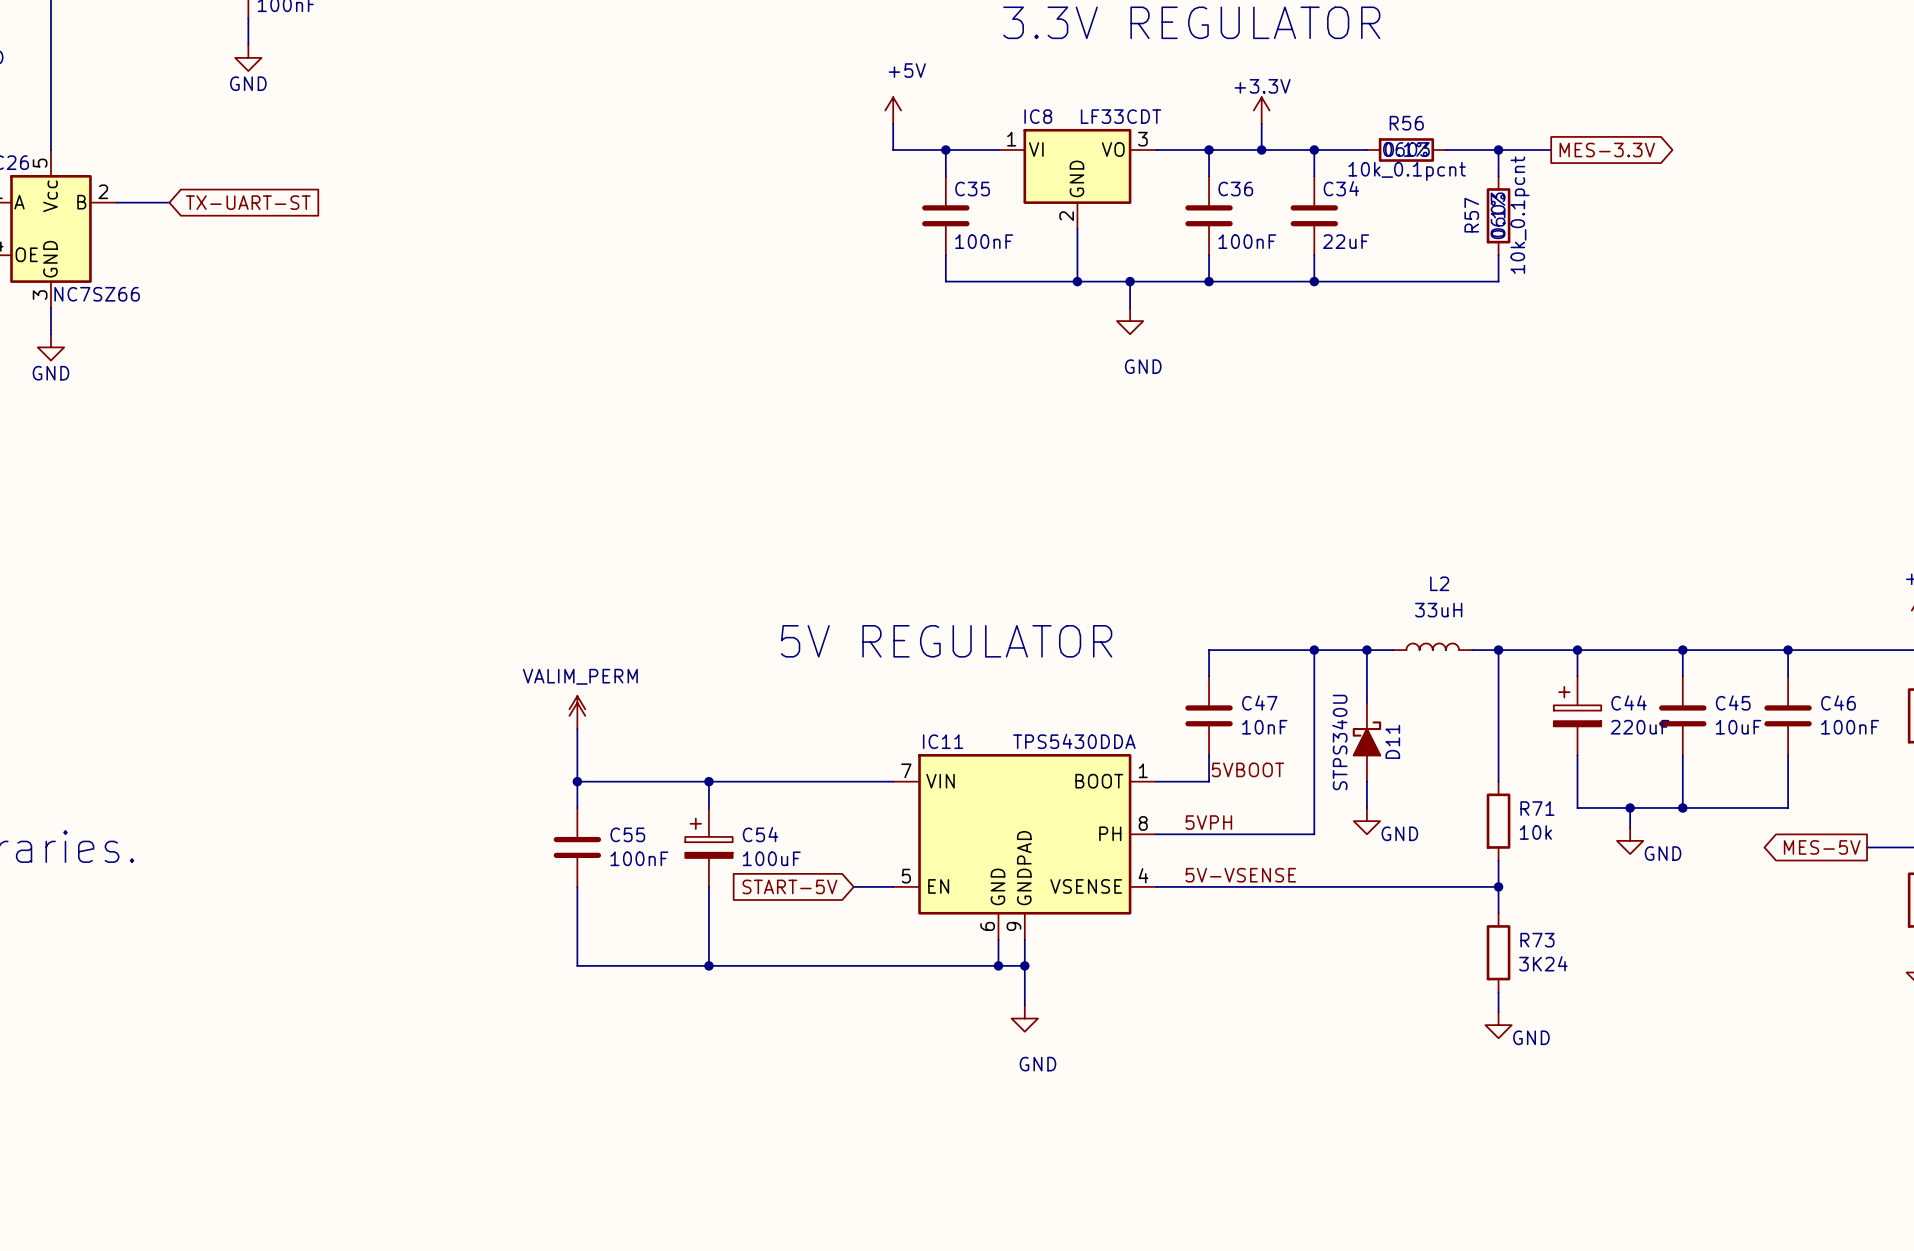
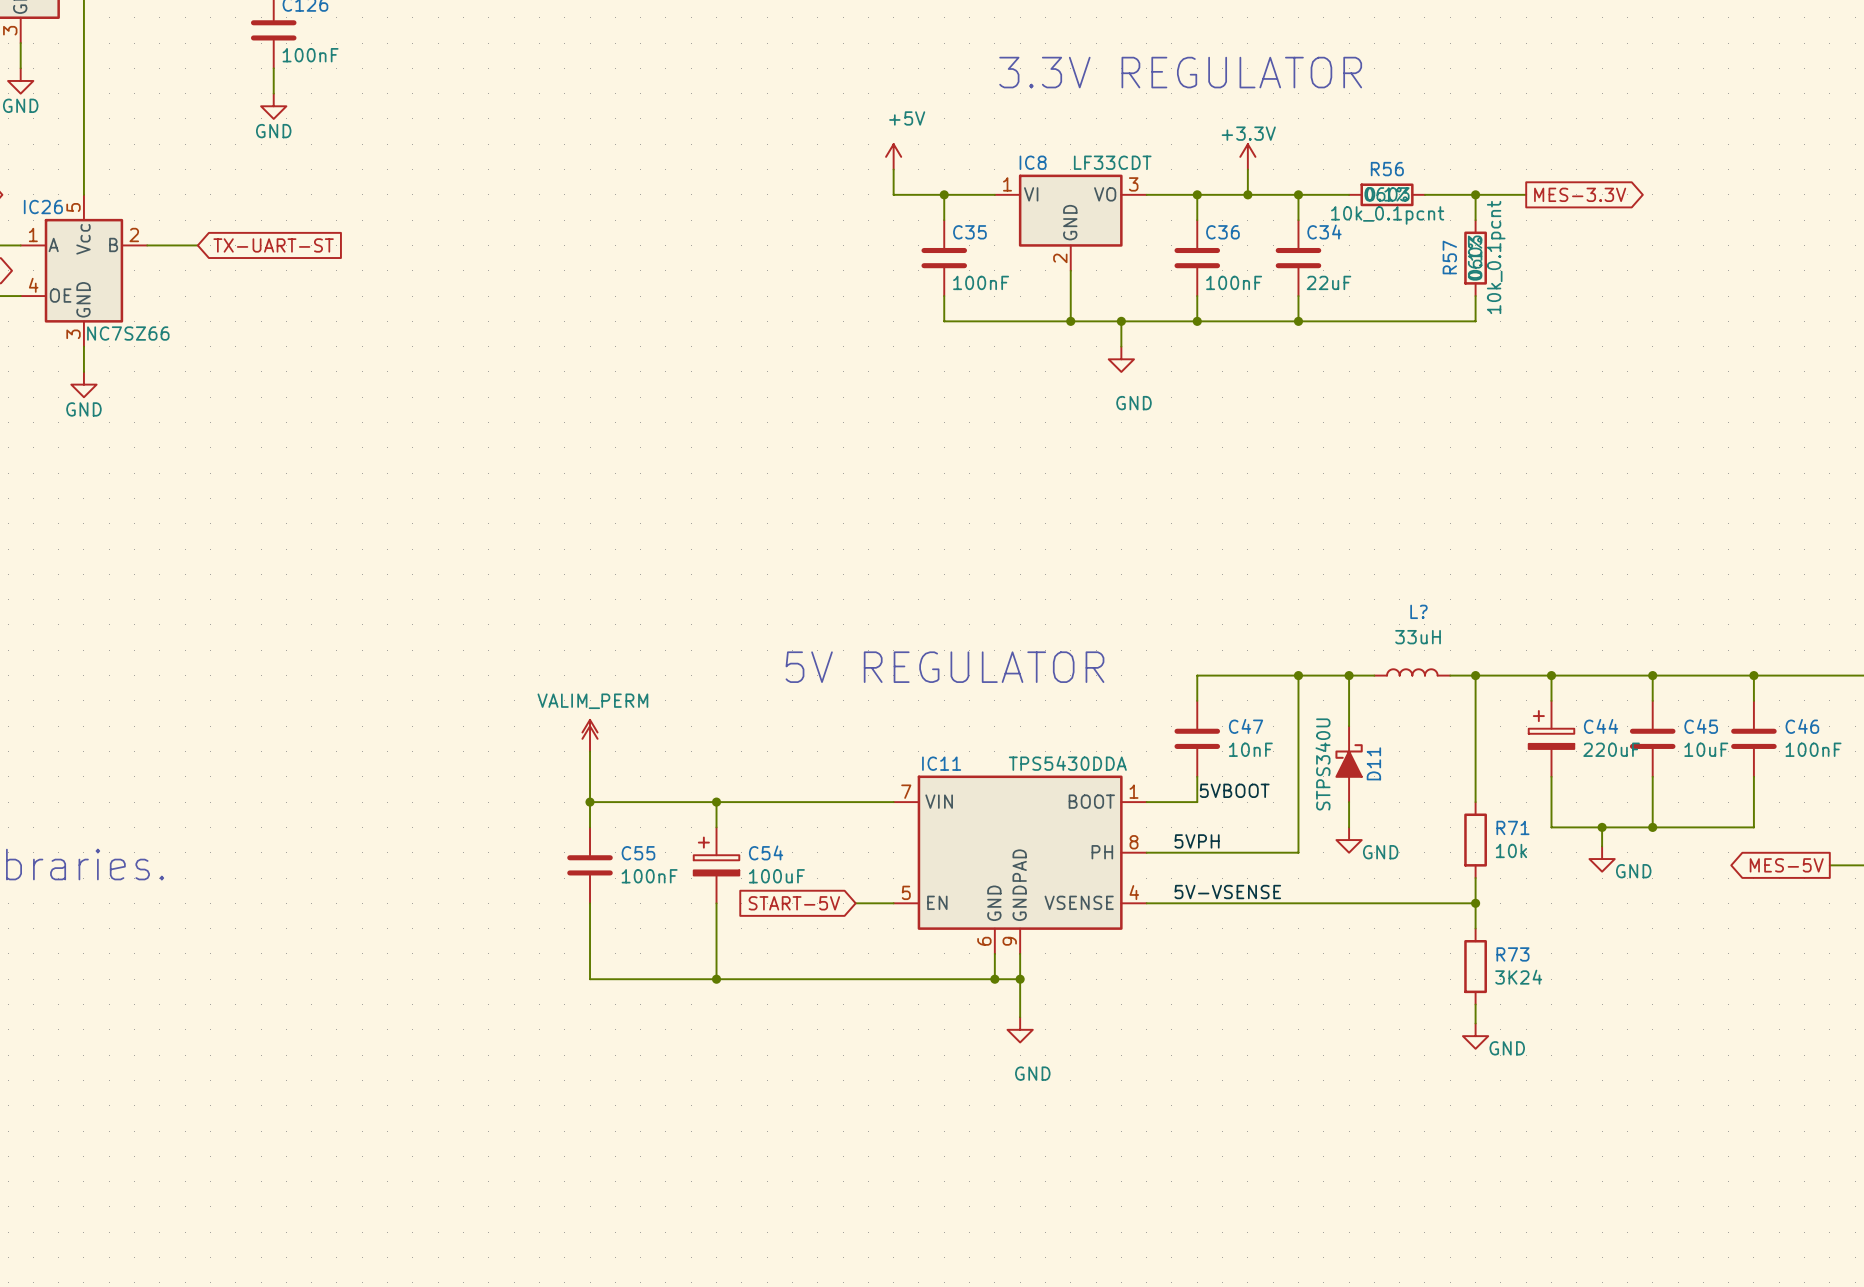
L2 name: L2 (1439, 583) -> L? (1418, 611)

